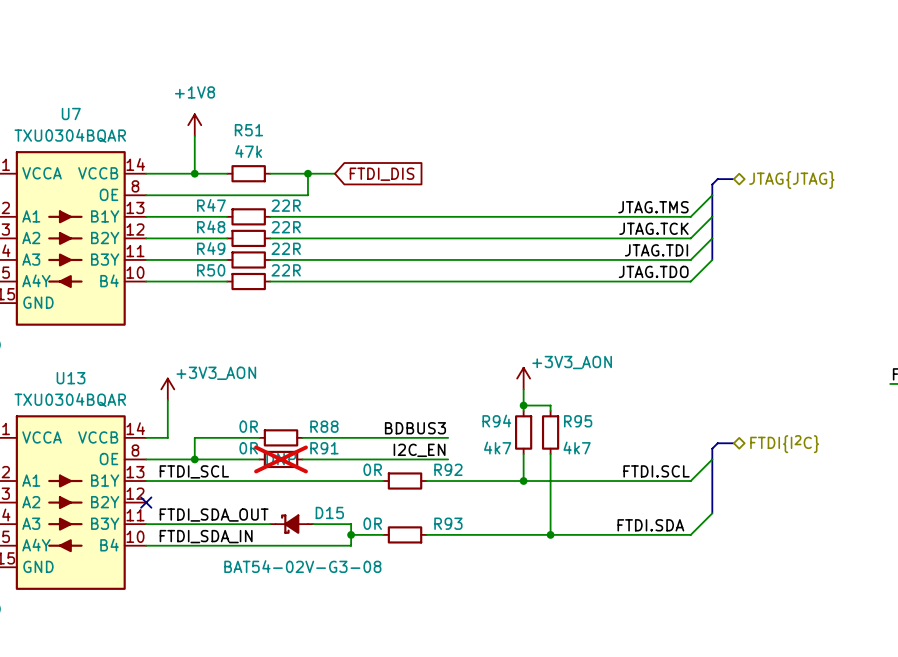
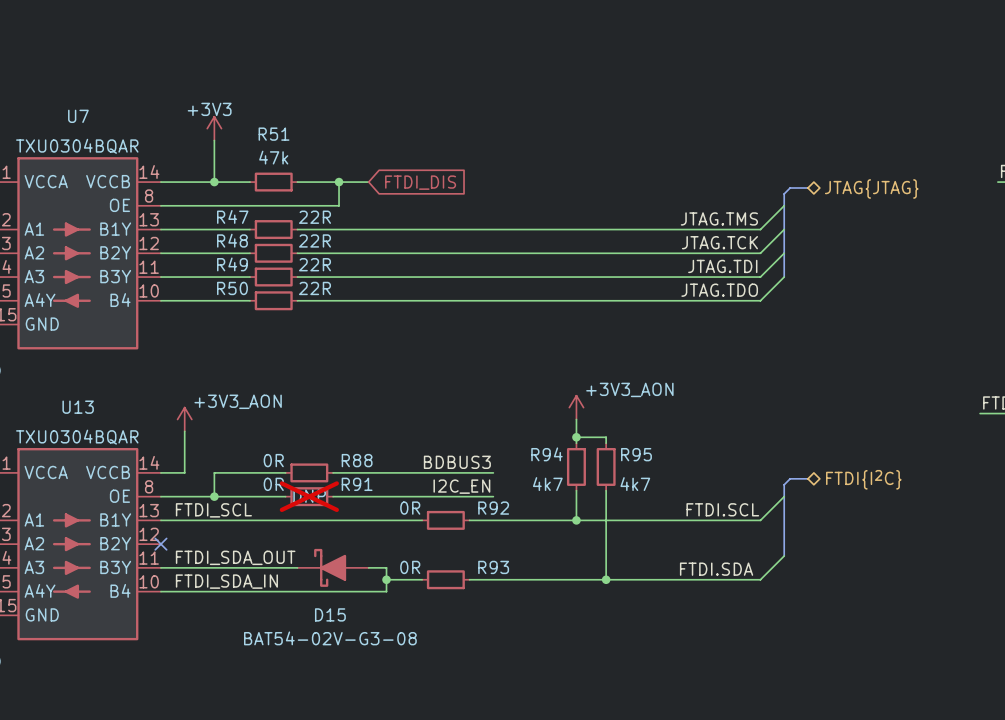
power symbol: +1V8 (194, 125) -> +3V3 (214, 128)
U7 text: TXU0304BQAR (70, 135) -> none
U7 value: none -> TXU0304BQAR (77, 146)
U13 text: TXU0304BQAR (70, 399) -> none
U13 value: none -> TXU0304BQAR (77, 437)
D15 name position: D15 (329, 512) -> D15 (330, 614)
D15 symbol: [270, 514, 314, 534] -> [297, 548, 369, 587]
D15 text: BAT54-02V-G3-08 (302, 566) -> none
D15 value: none -> BAT54-02V-G3-08 (330, 638)

